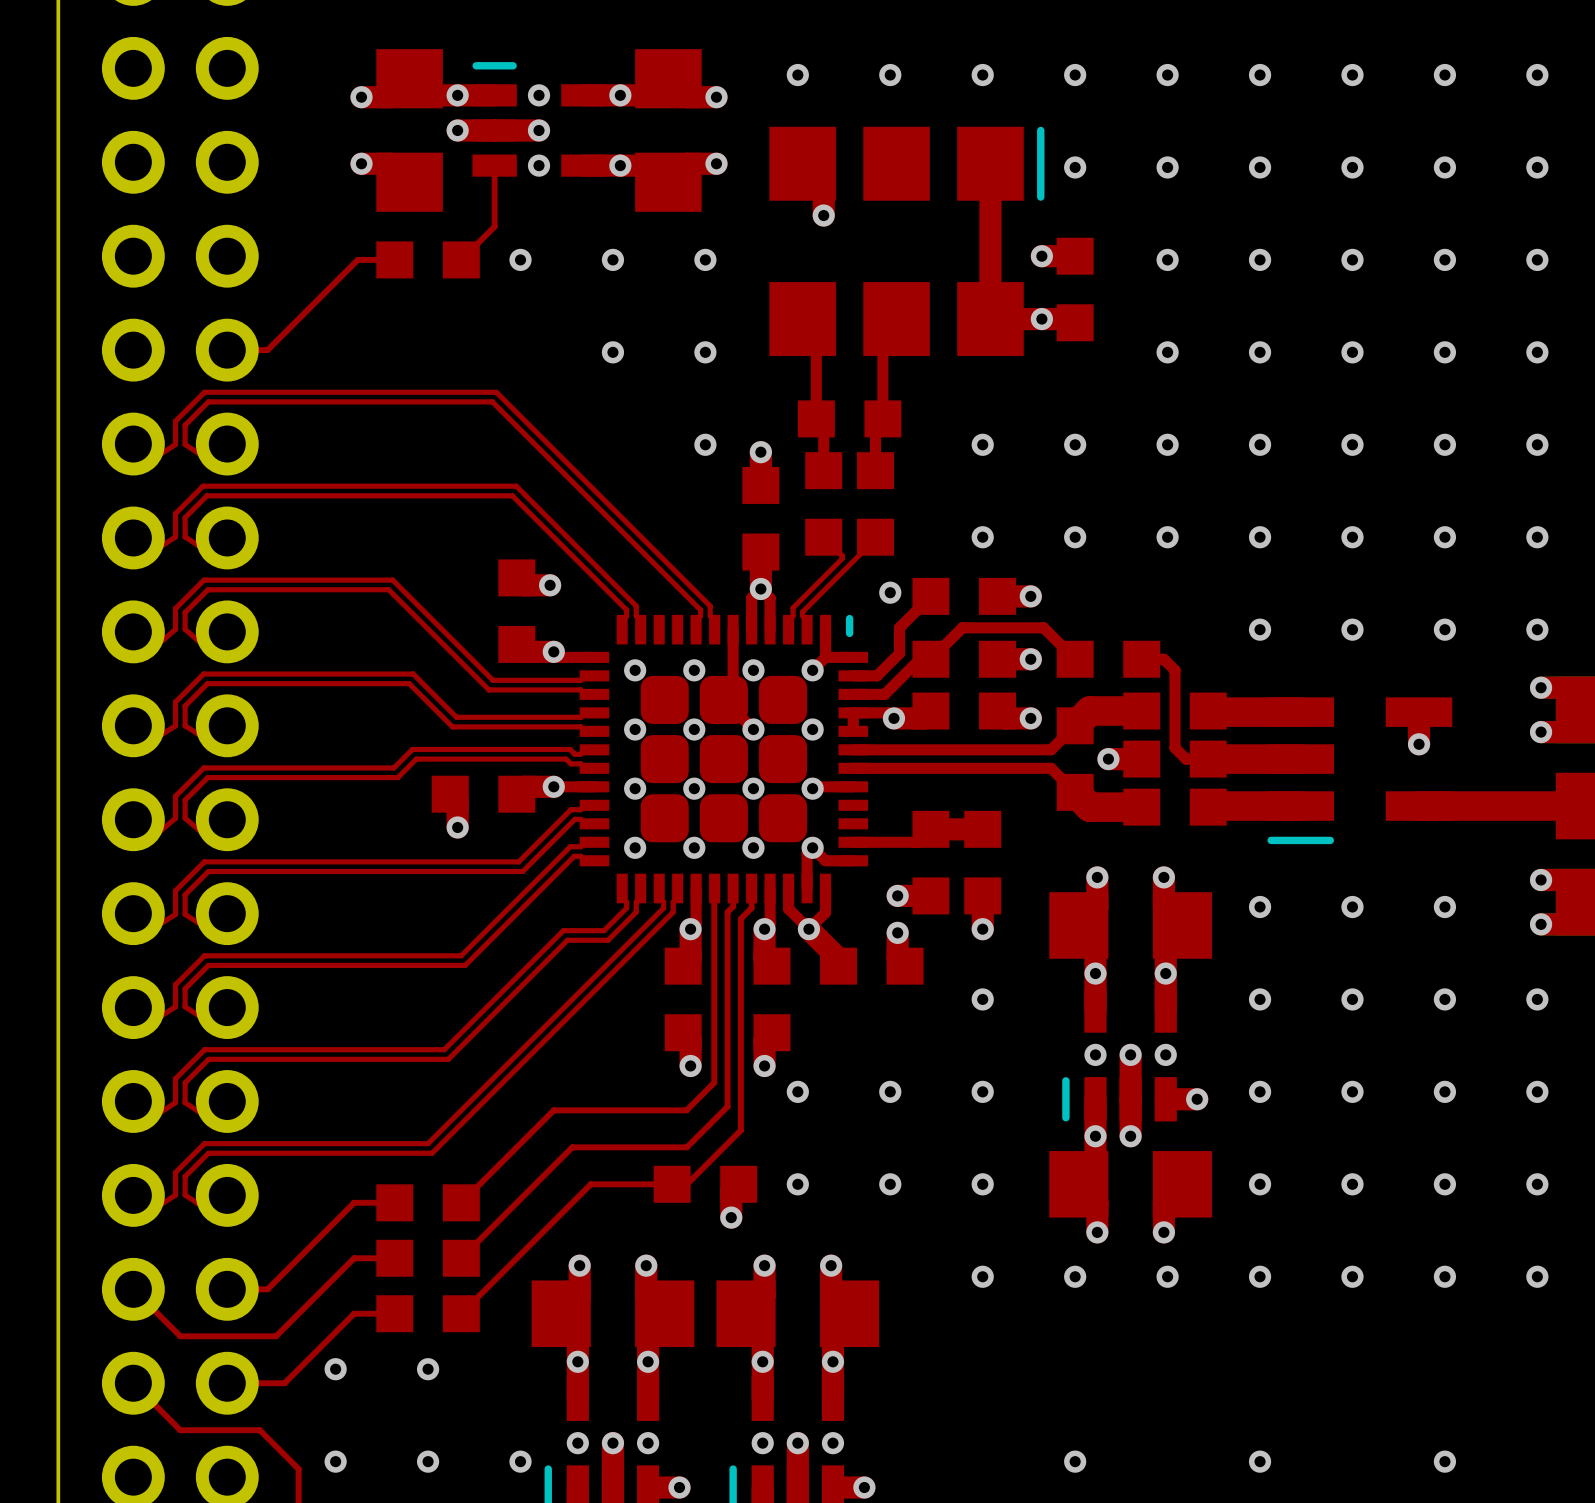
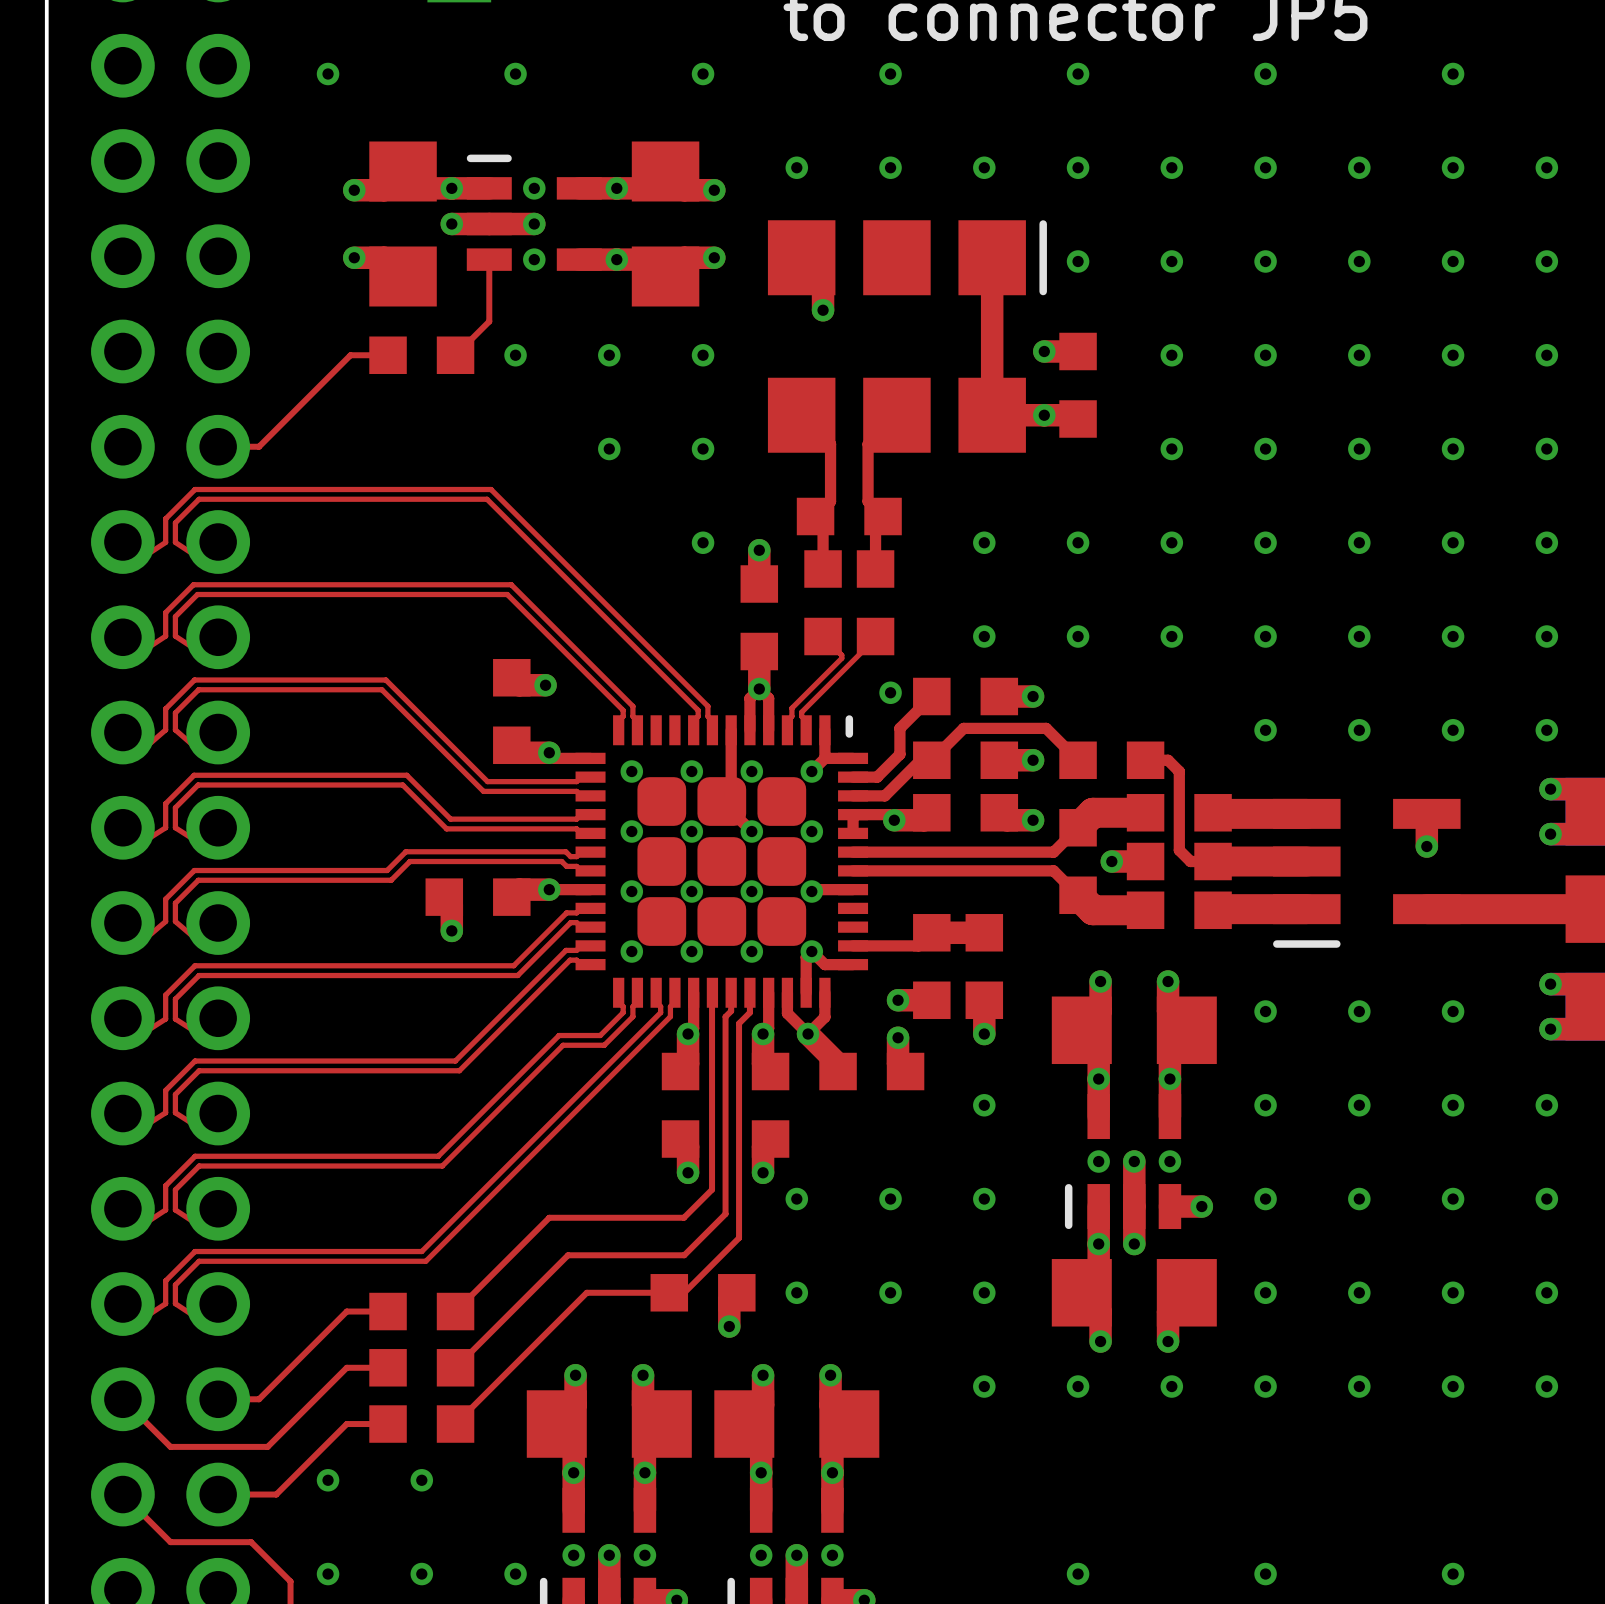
top track: (816, 332) (816, 418) -> (815, 429) (830, 444) (830, 501) (815, 516)
top track: (882, 332) (882, 418) -> (883, 429) (868, 444) (868, 501) (883, 516)

